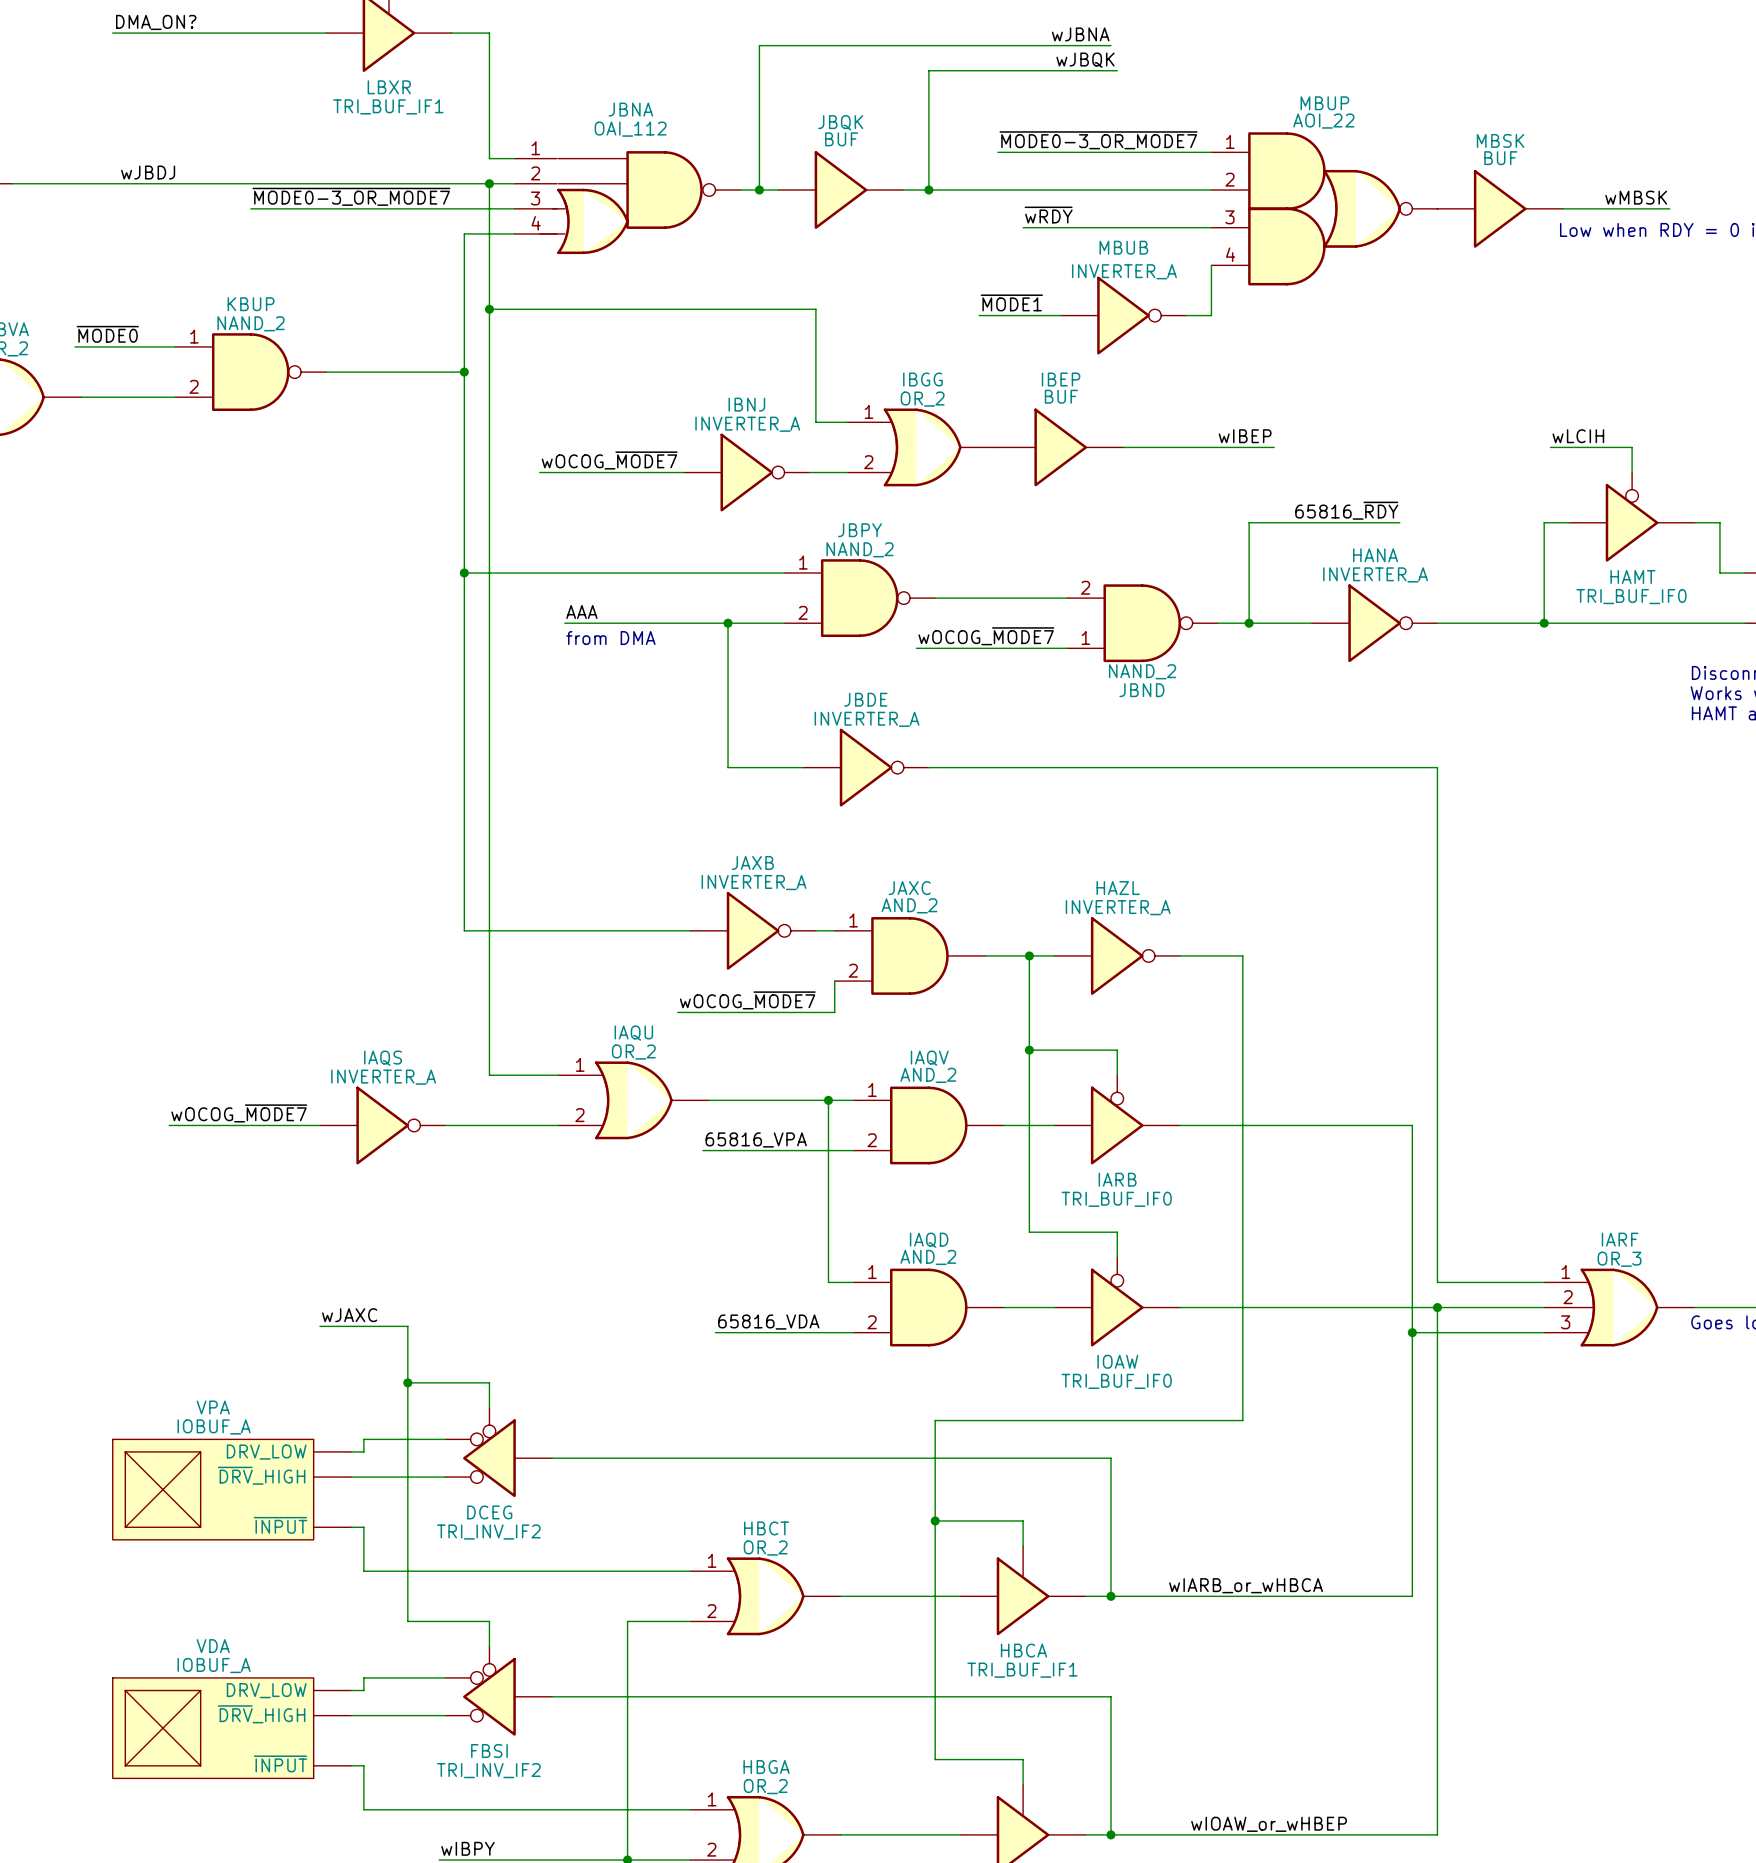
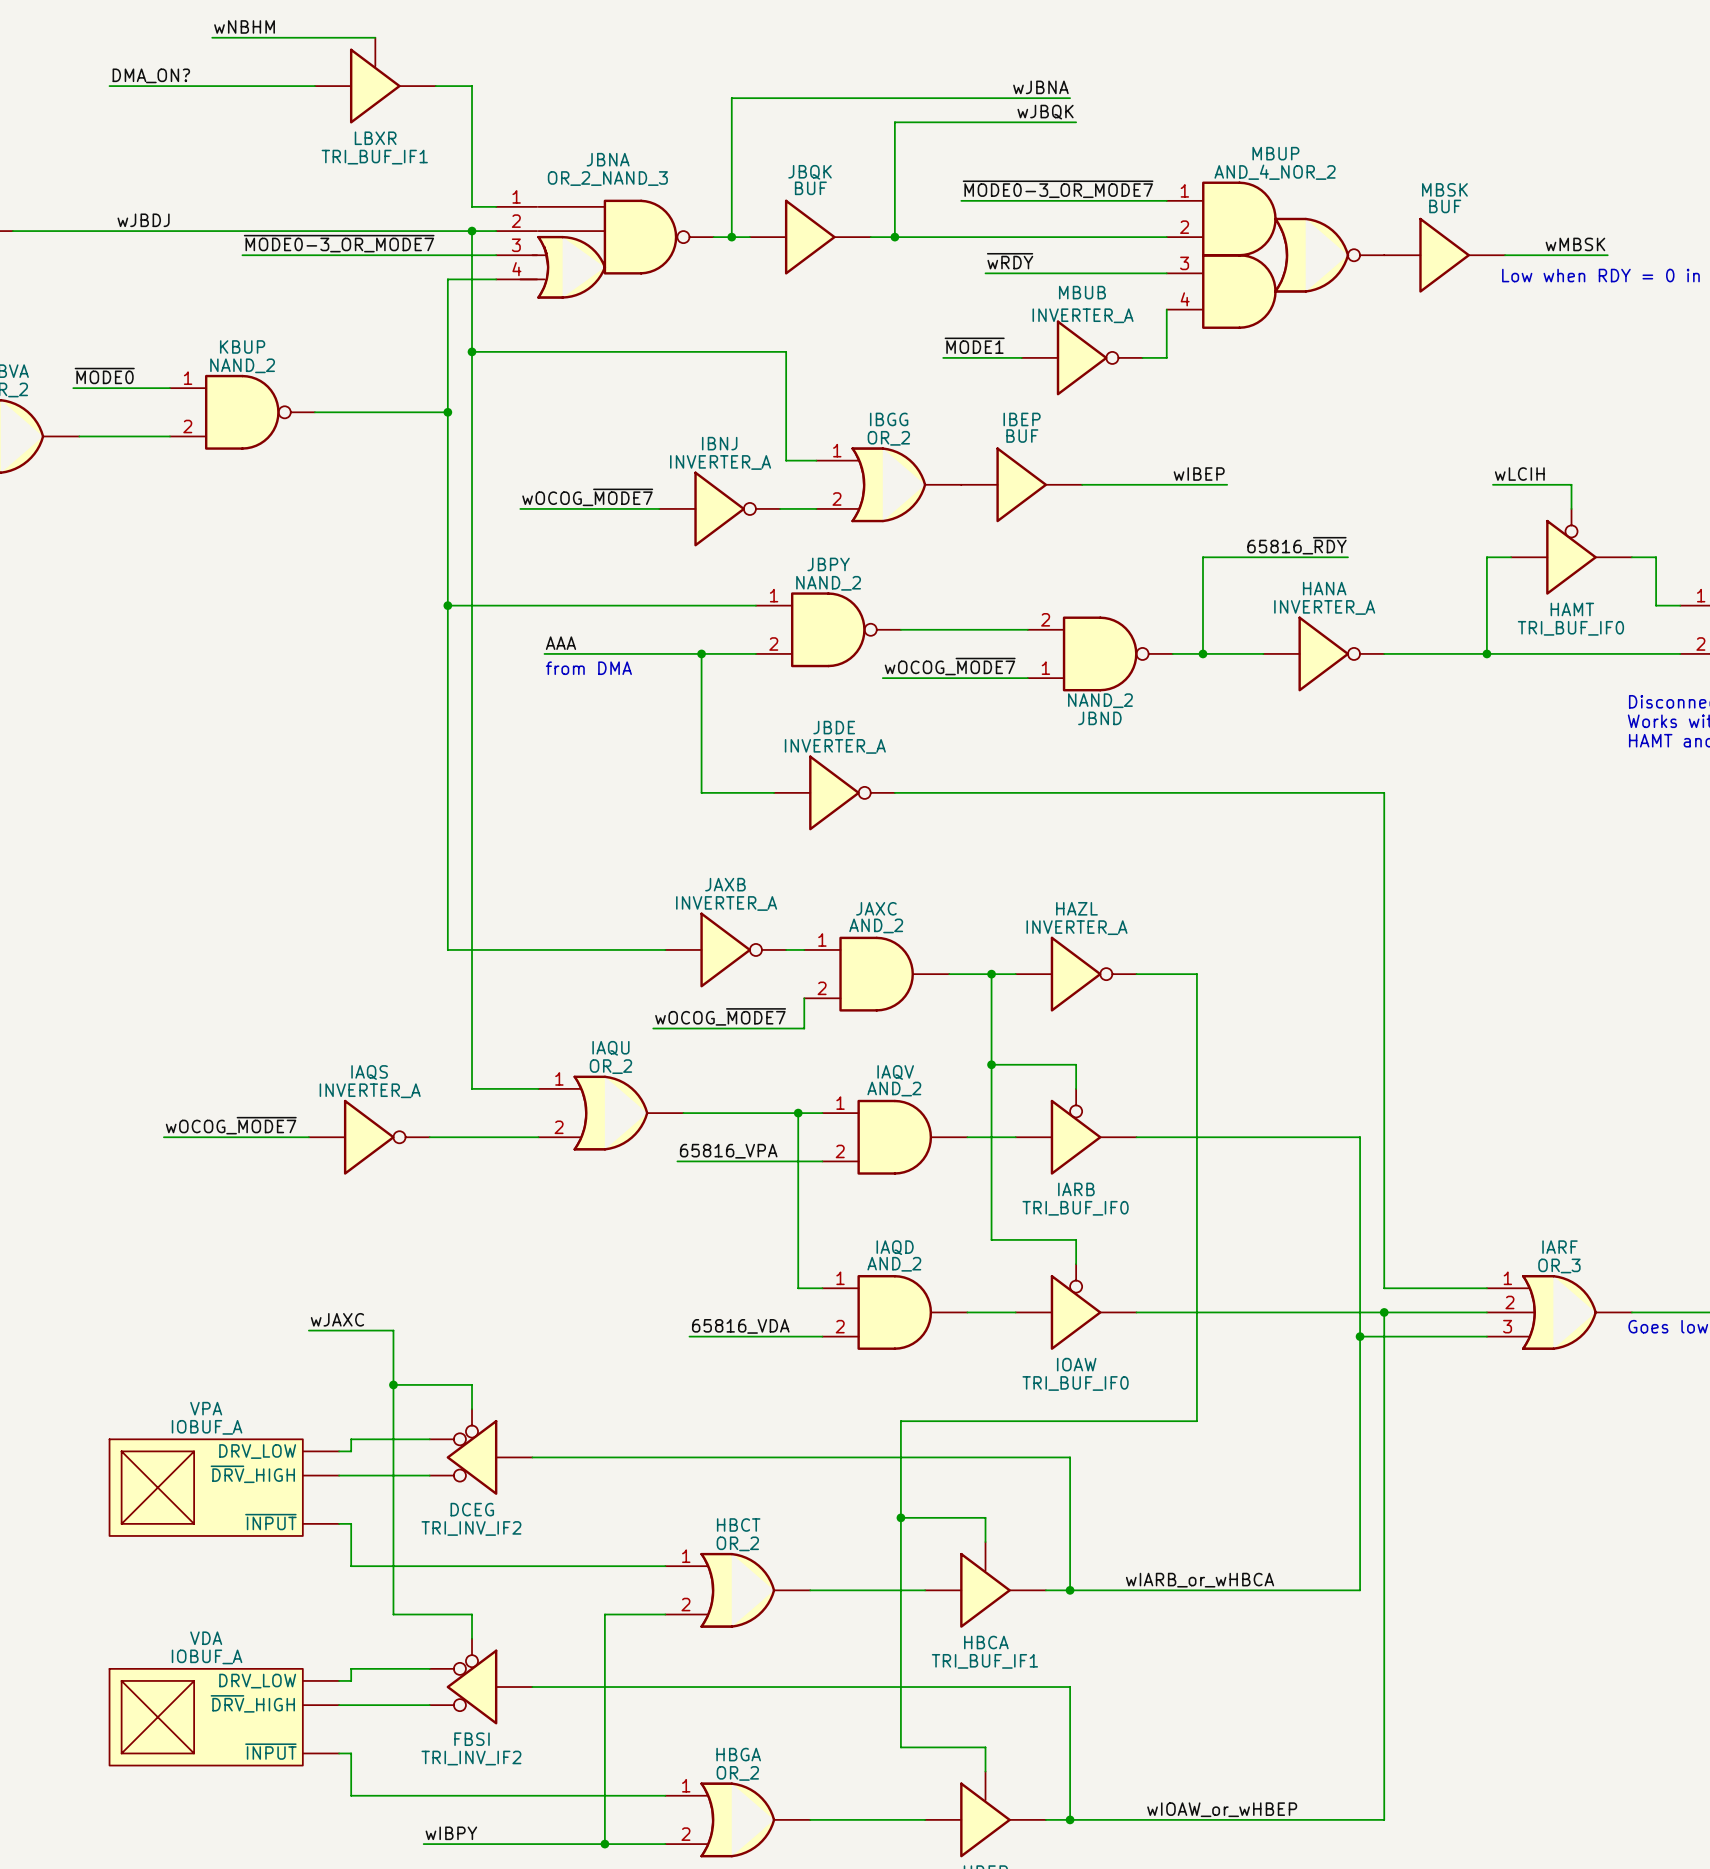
MBUP value: AOI_22 (1323, 121) -> AND_4_NOR_2 (1275, 172)
JBNA value: OAI_112 (630, 129) -> OR_2_NAND_3 (607, 178)

